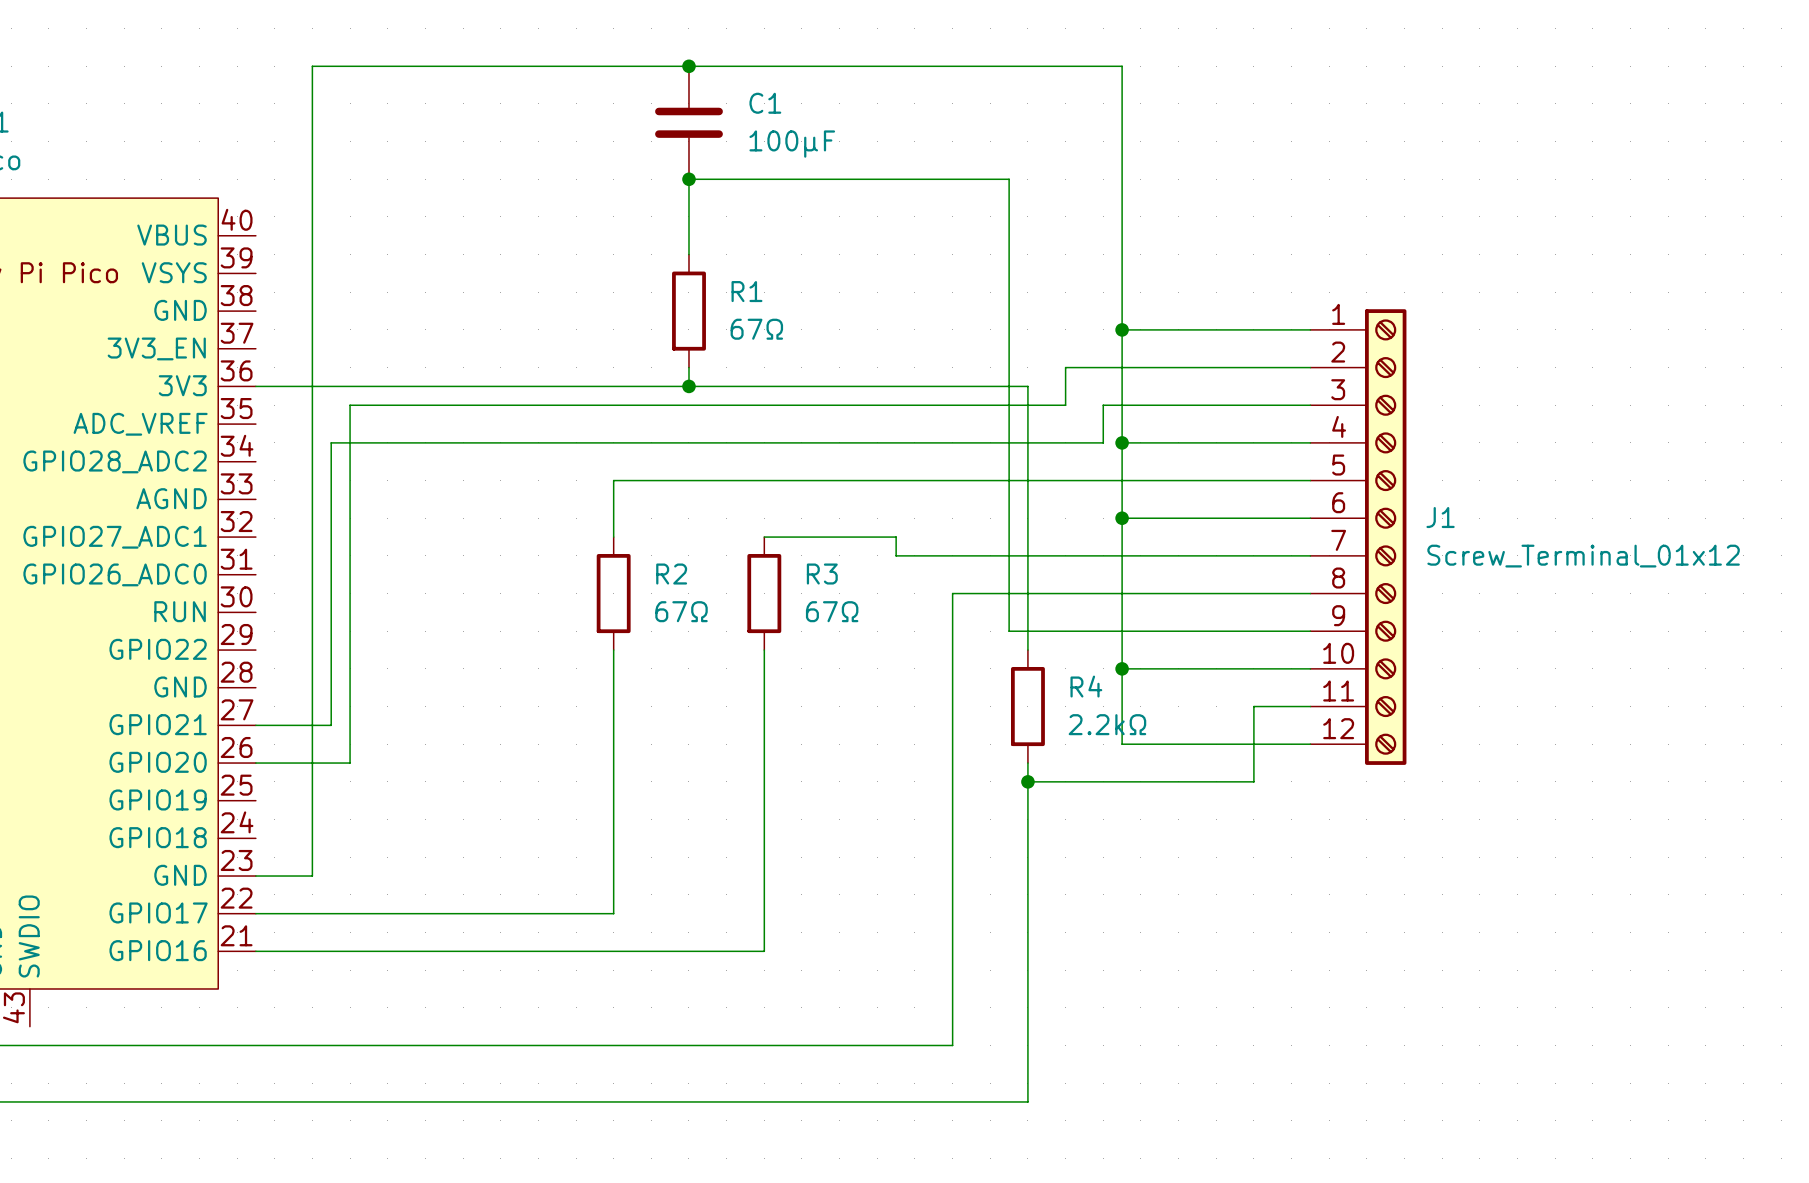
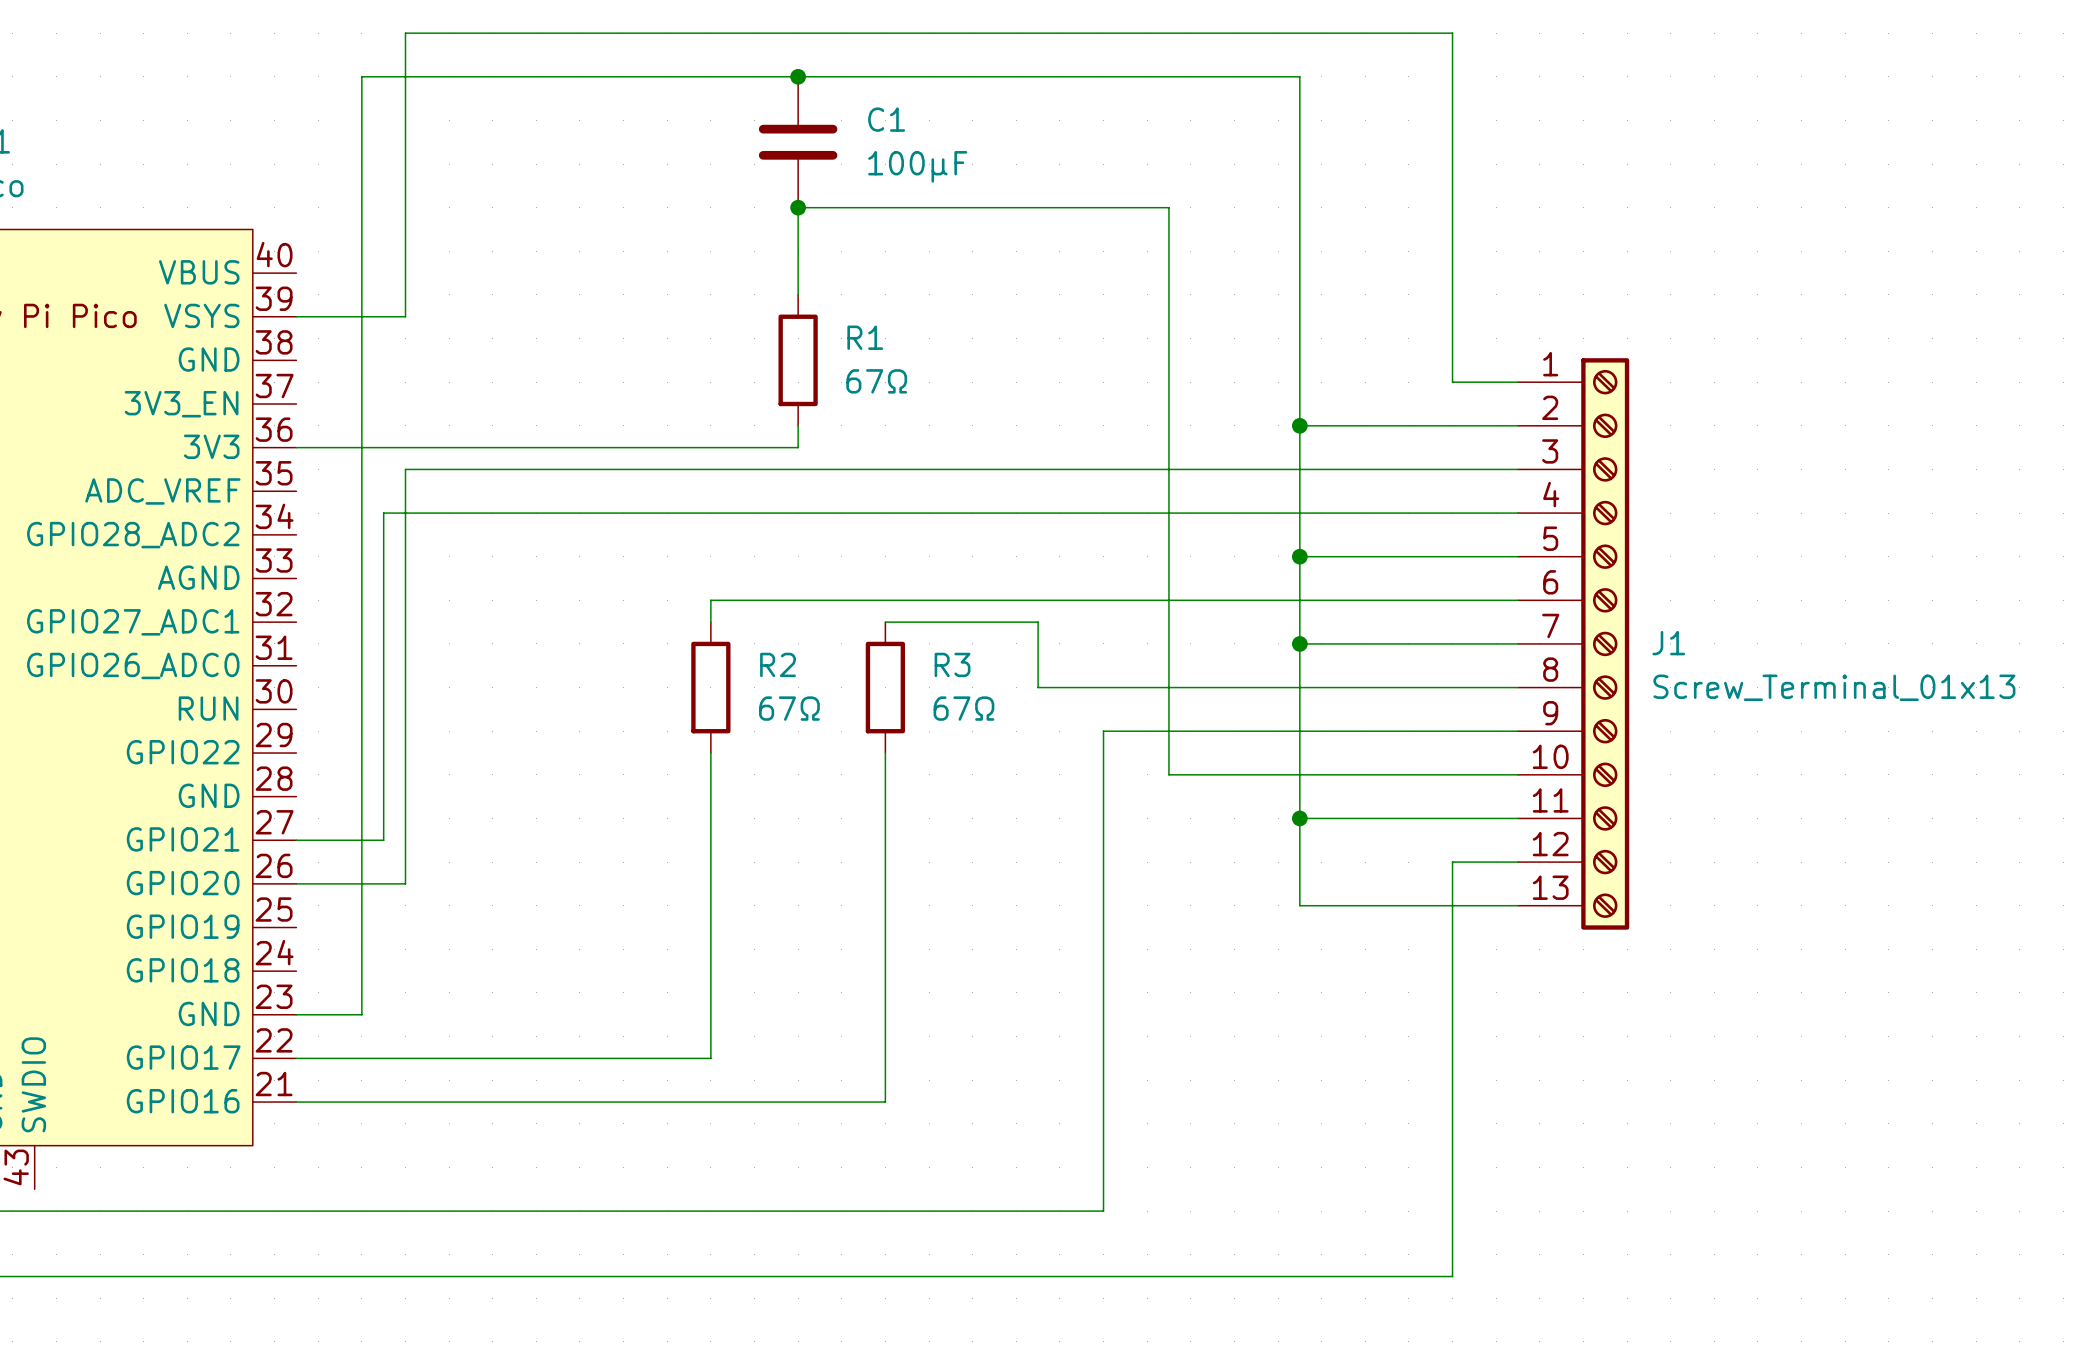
J1 symbol: [1310, 309, 1407, 765] -> [1517, 358, 1630, 930]
wire: (1122, 329) (1253, 329) -> (296, 316) (405, 316) (405, 33) (1452, 33) (1452, 382)
junction: (1122, 329) -> none
wire: (1122, 367) (1065, 367) (1065, 405) -> (1278, 469) (1234, 469)
junction: none -> (1299, 425)
wire: (688, 386) (1027, 386) (1027, 650) -> none
junction: (688, 386) -> none
wire: (1103, 405) (1103, 442) -> (1299, 513) (1278, 513)
junction: (1122, 442) -> none
wire: (1122, 480) (613, 480) (613, 518) -> (1299, 600) (710, 600)
junction: none -> (1299, 556)
junction: (1122, 518) -> none
wire: (896, 555) (1122, 555) -> none
junction: none -> (1299, 643)
J1 value: Screw_Terminal_01x12 (1583, 556) -> Screw_Terminal_01x13 (1834, 687)
wire: (952, 593) (952, 631) -> (1103, 687) (1038, 687) (1038, 643)
wire: none -> (1103, 731) (1168, 731) (1168, 774) (1299, 774)
junction position: (1122, 668) -> (1299, 818)
R4: 2.2kΩ (1027, 706) -> none
wire: (1253, 706) (1253, 744) (1122, 744) -> (1452, 818) (1299, 818)
wire: (1027, 763) (1027, 1101) -> (1517, 905) (1452, 905) (1452, 1276) (1190, 1276)
wire: (1027, 781) (1122, 781) -> (1299, 862) (1299, 905)
junction: (1027, 781) -> none

